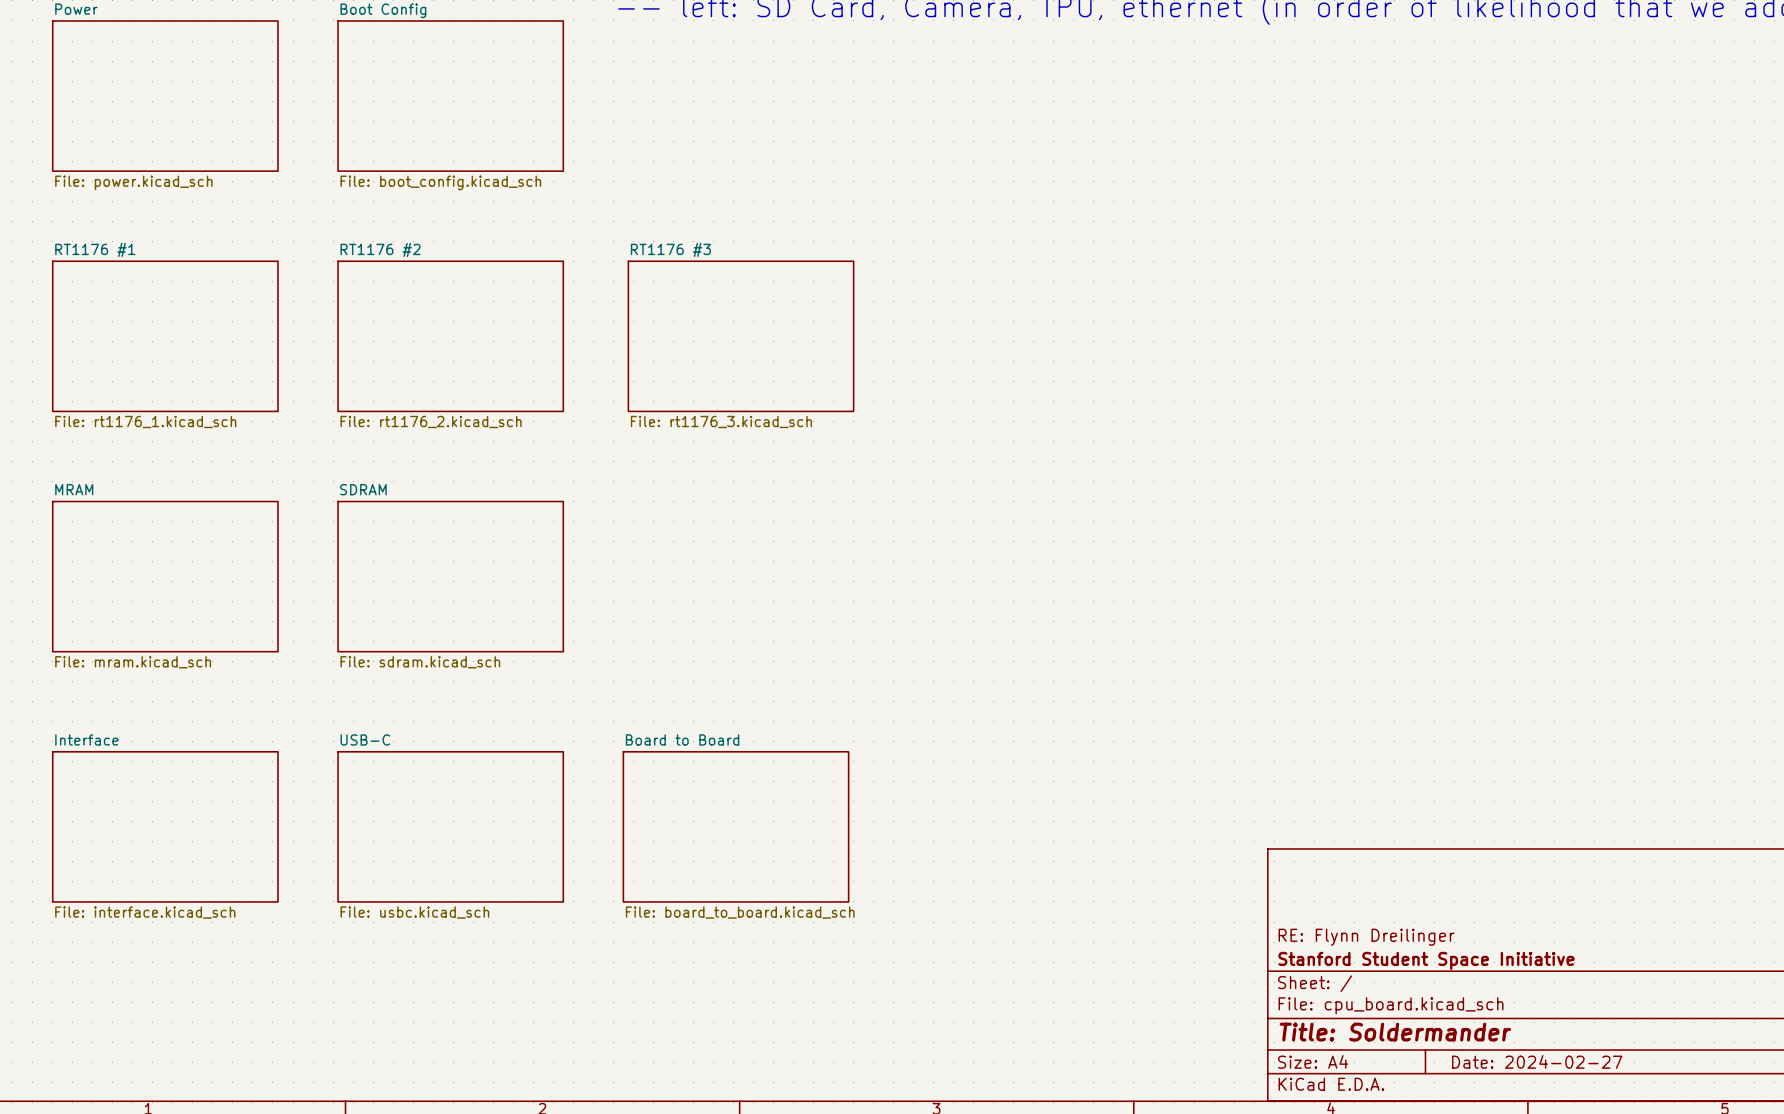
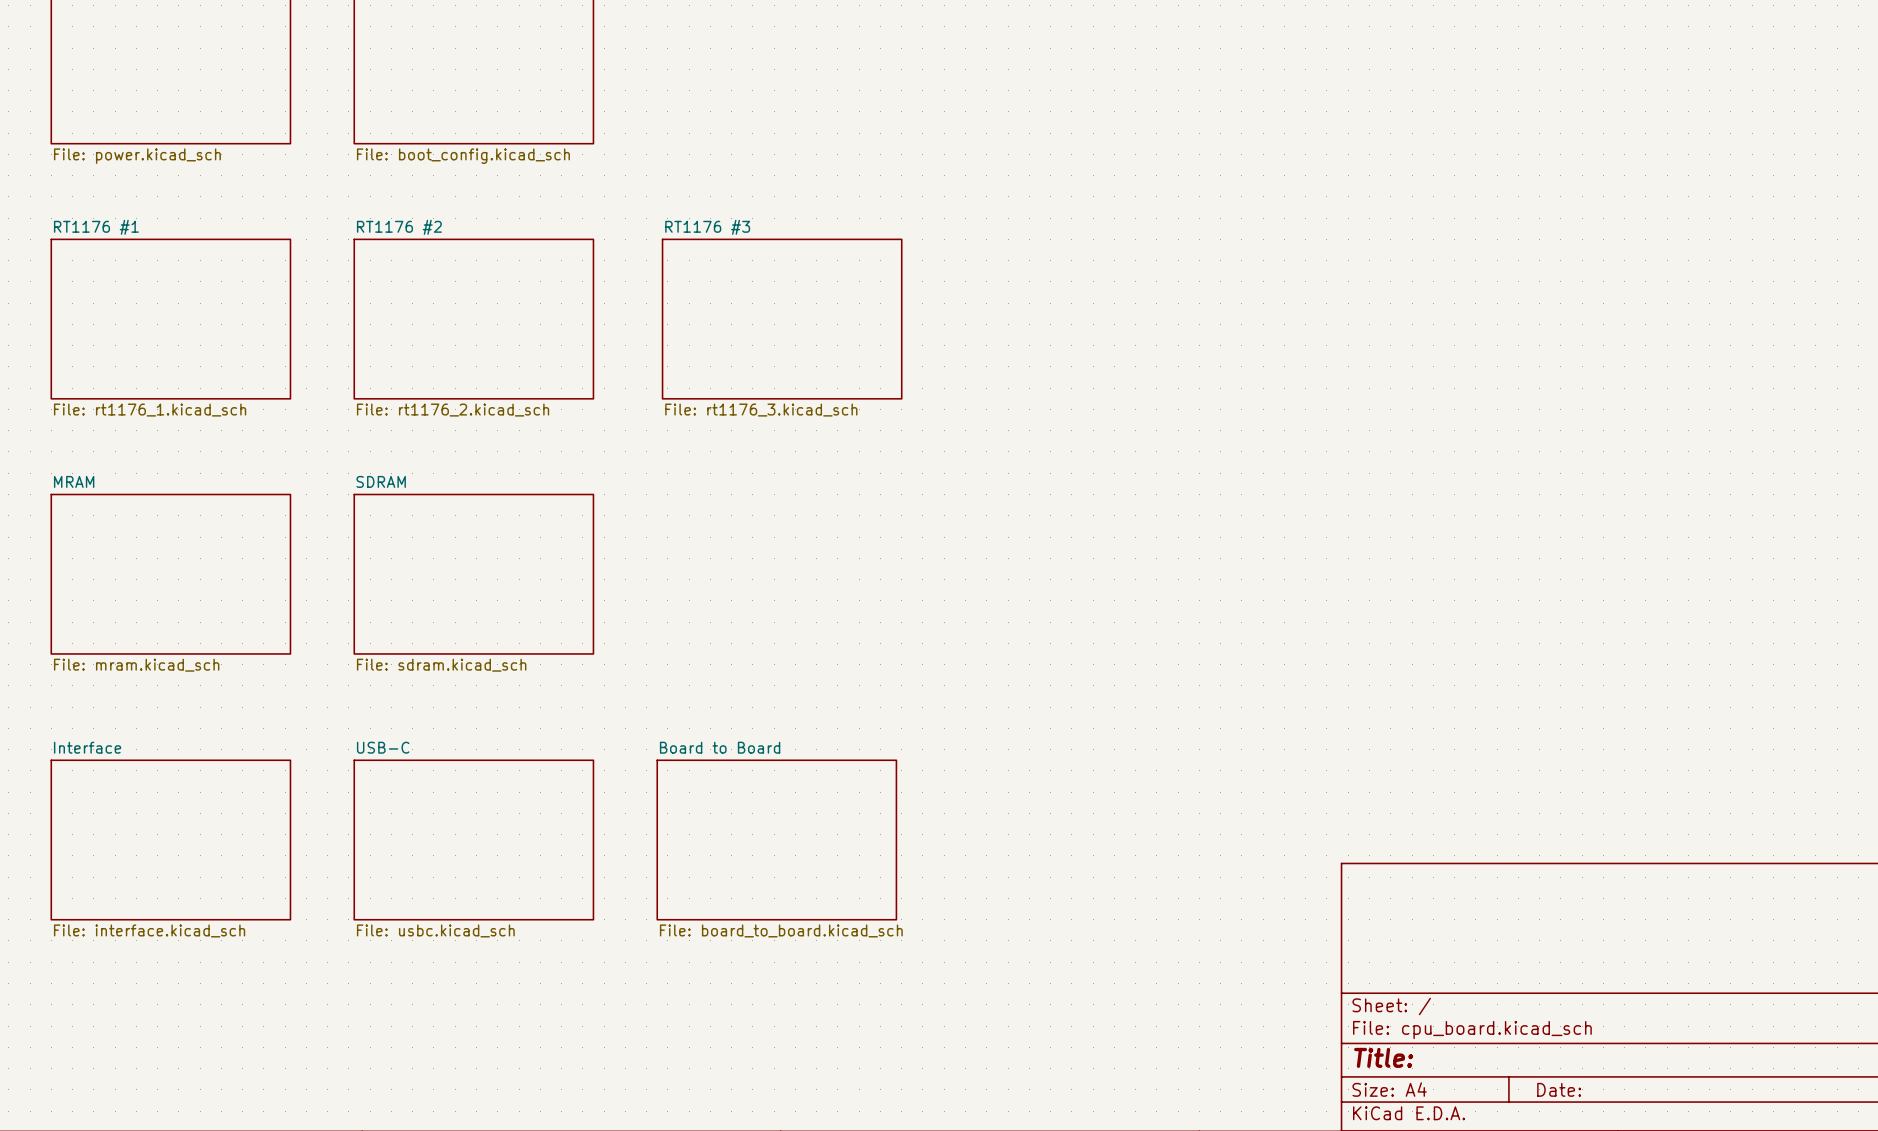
title block: RE: Flynn Dreilinger (1366, 937) -> none
title block: Stanford Student Space Initiative (1426, 960) -> none
title block: Title: Soldermander (1395, 1032) -> Title: (1383, 1057)
title block: Date: 2024-02-27 (1537, 1061) -> Date: (1559, 1089)

